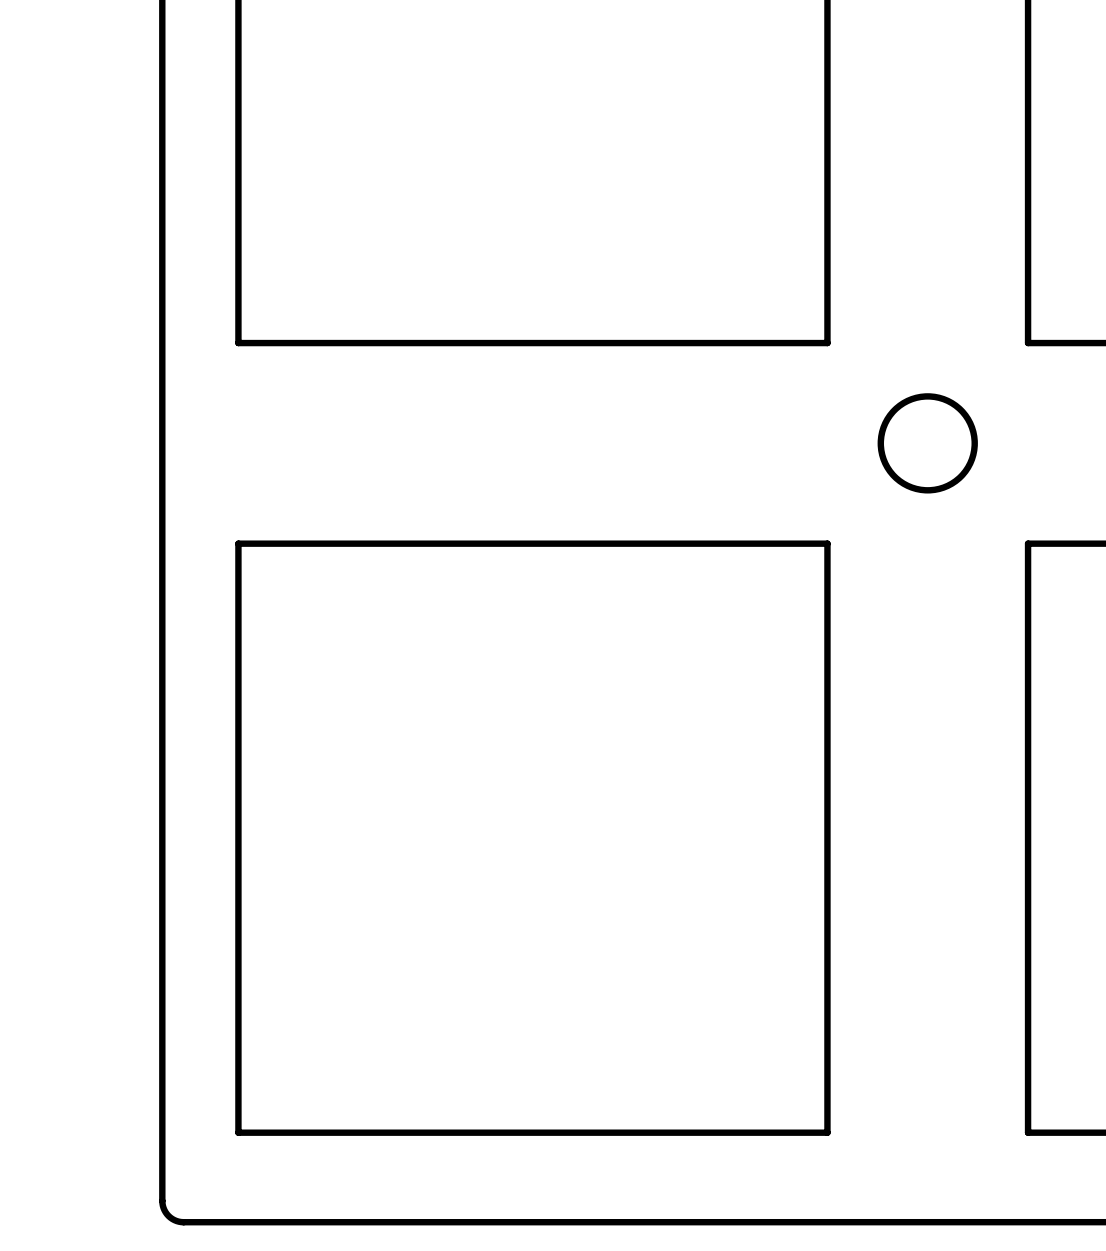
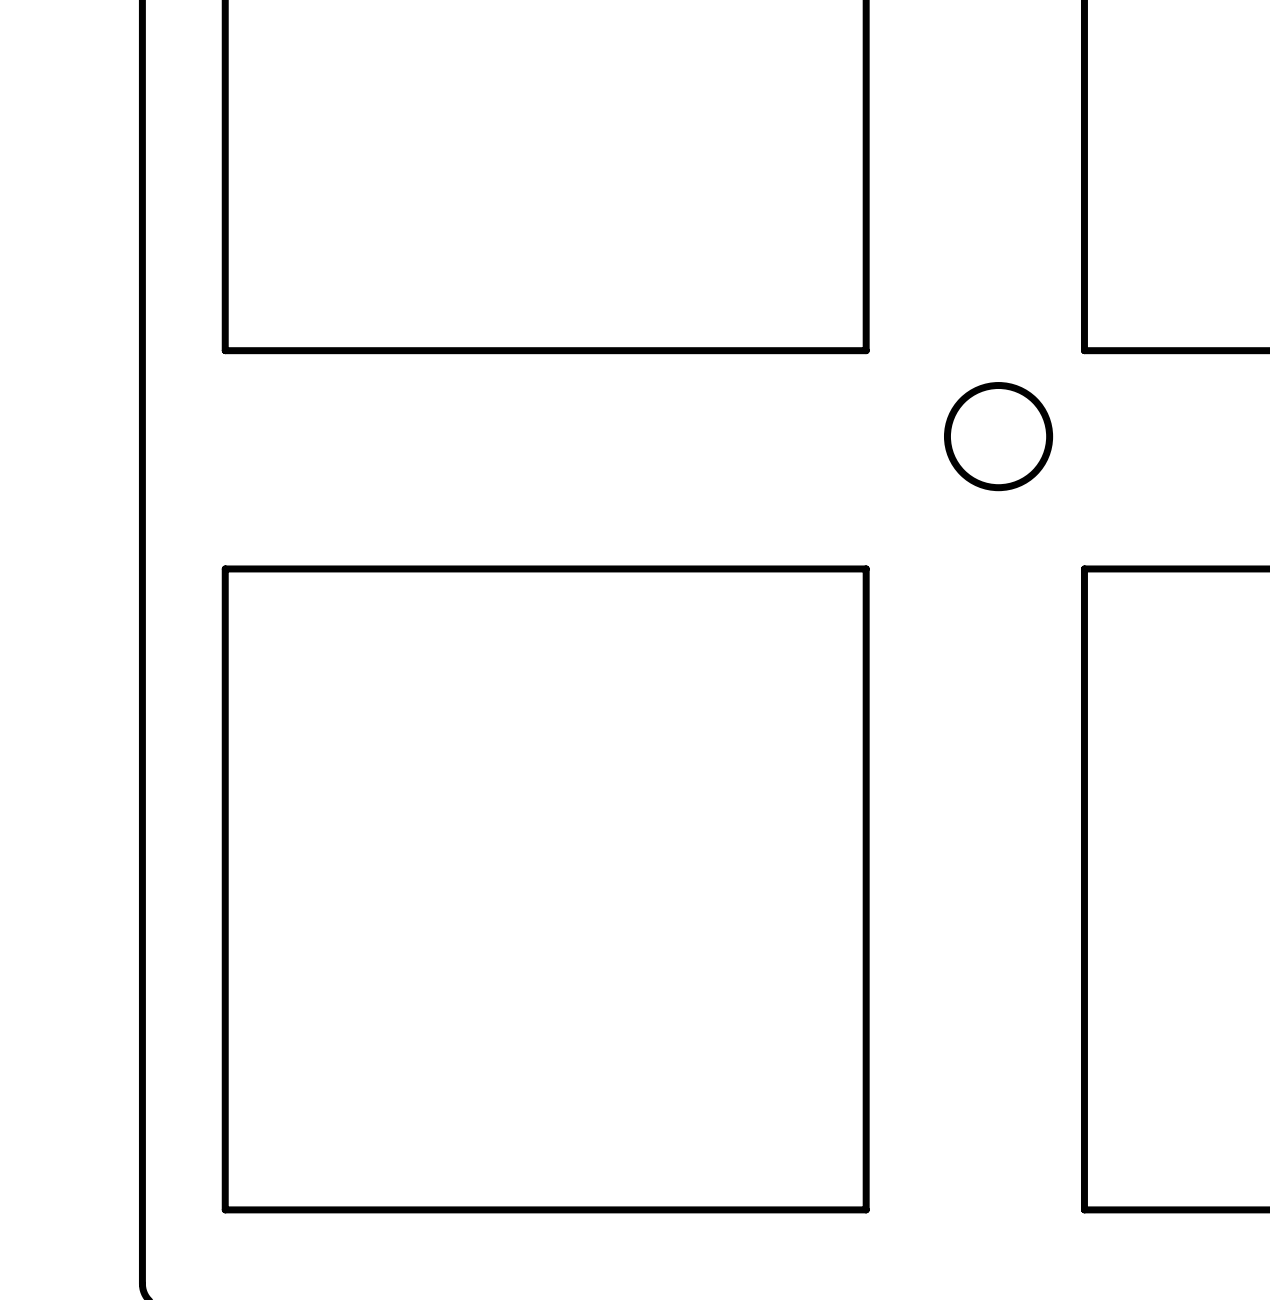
round board edge position: (927, 443) -> (998, 436)

